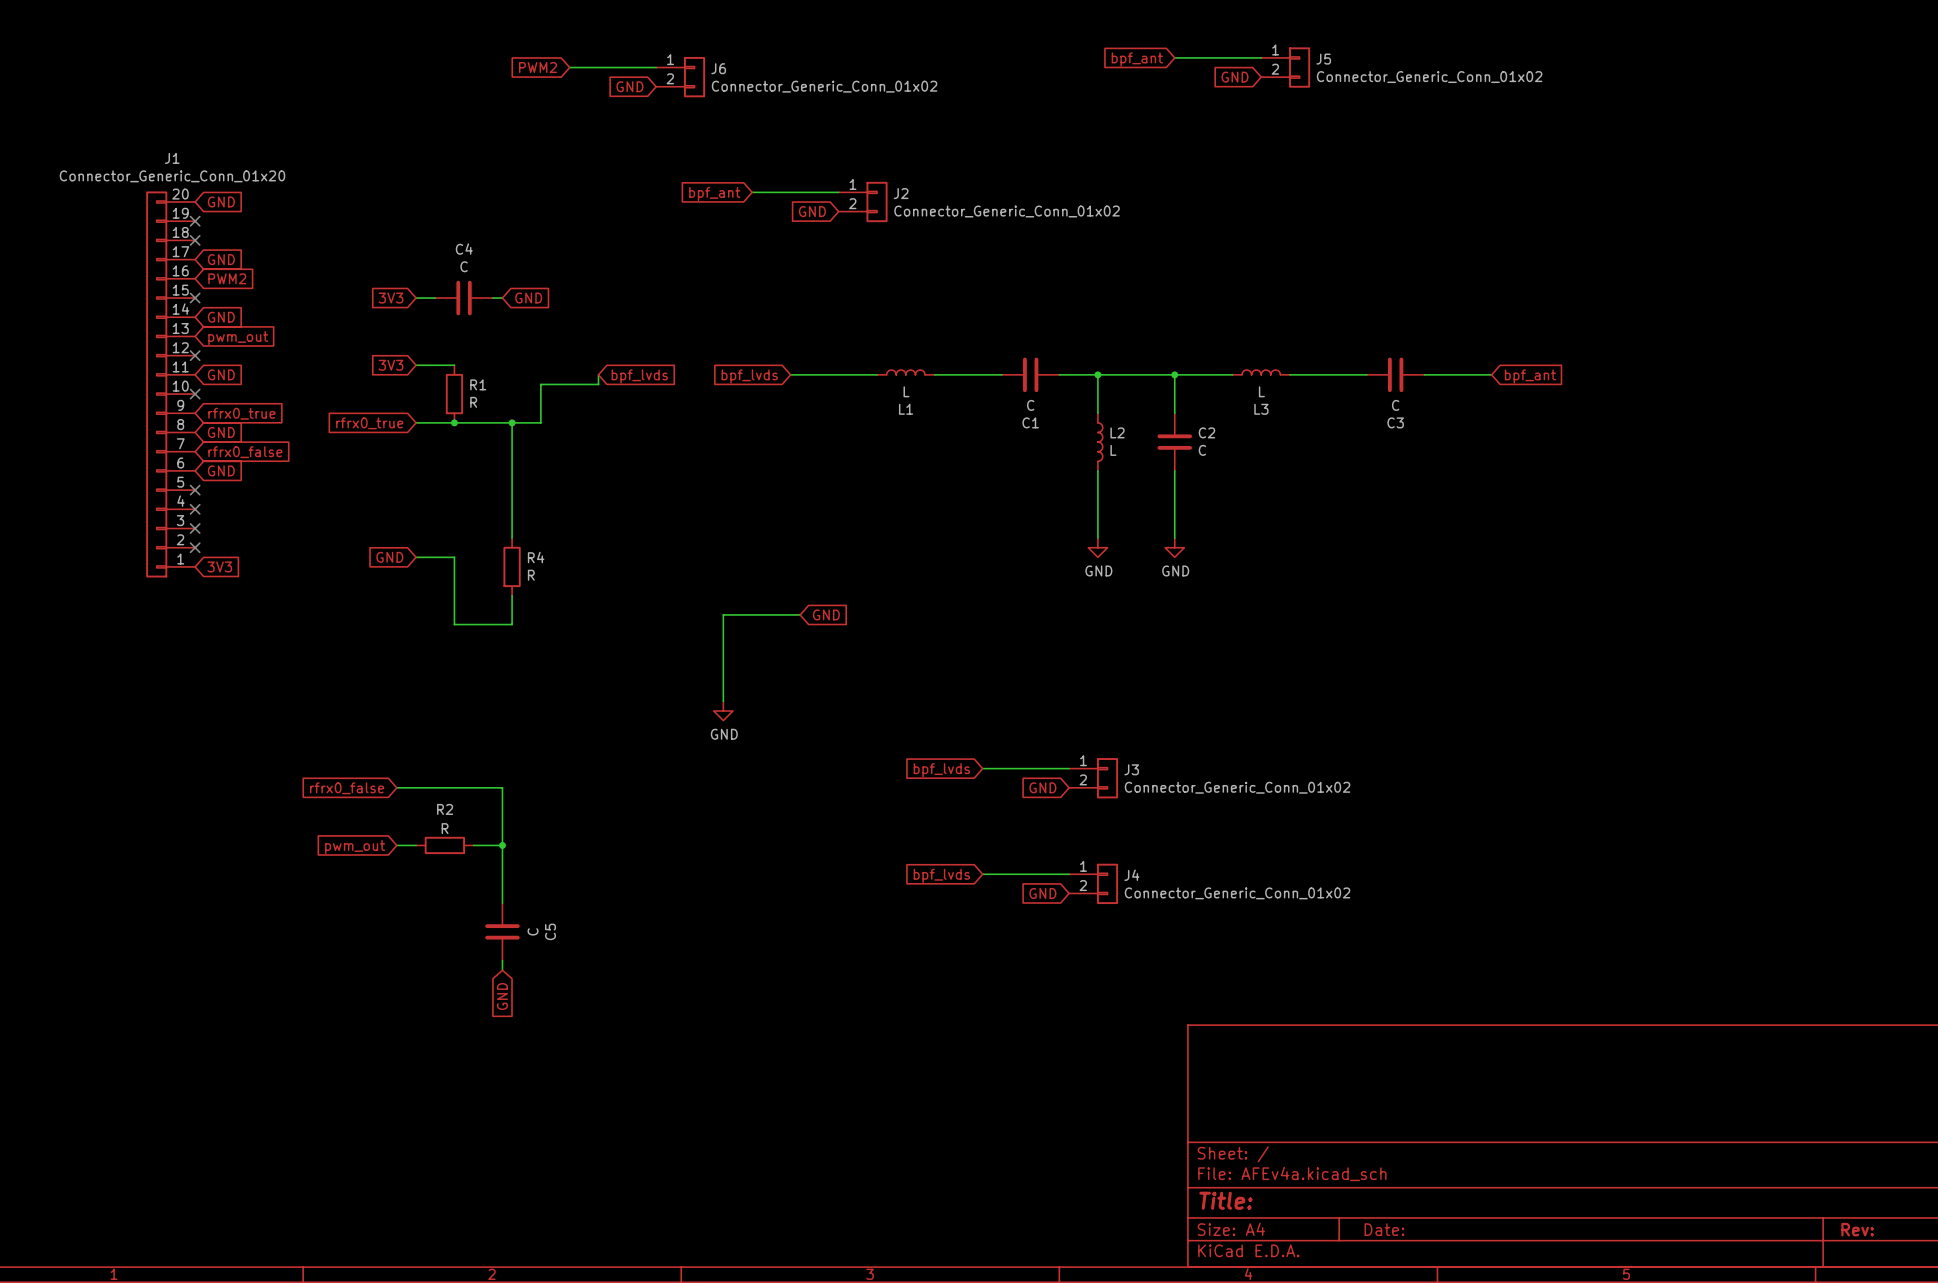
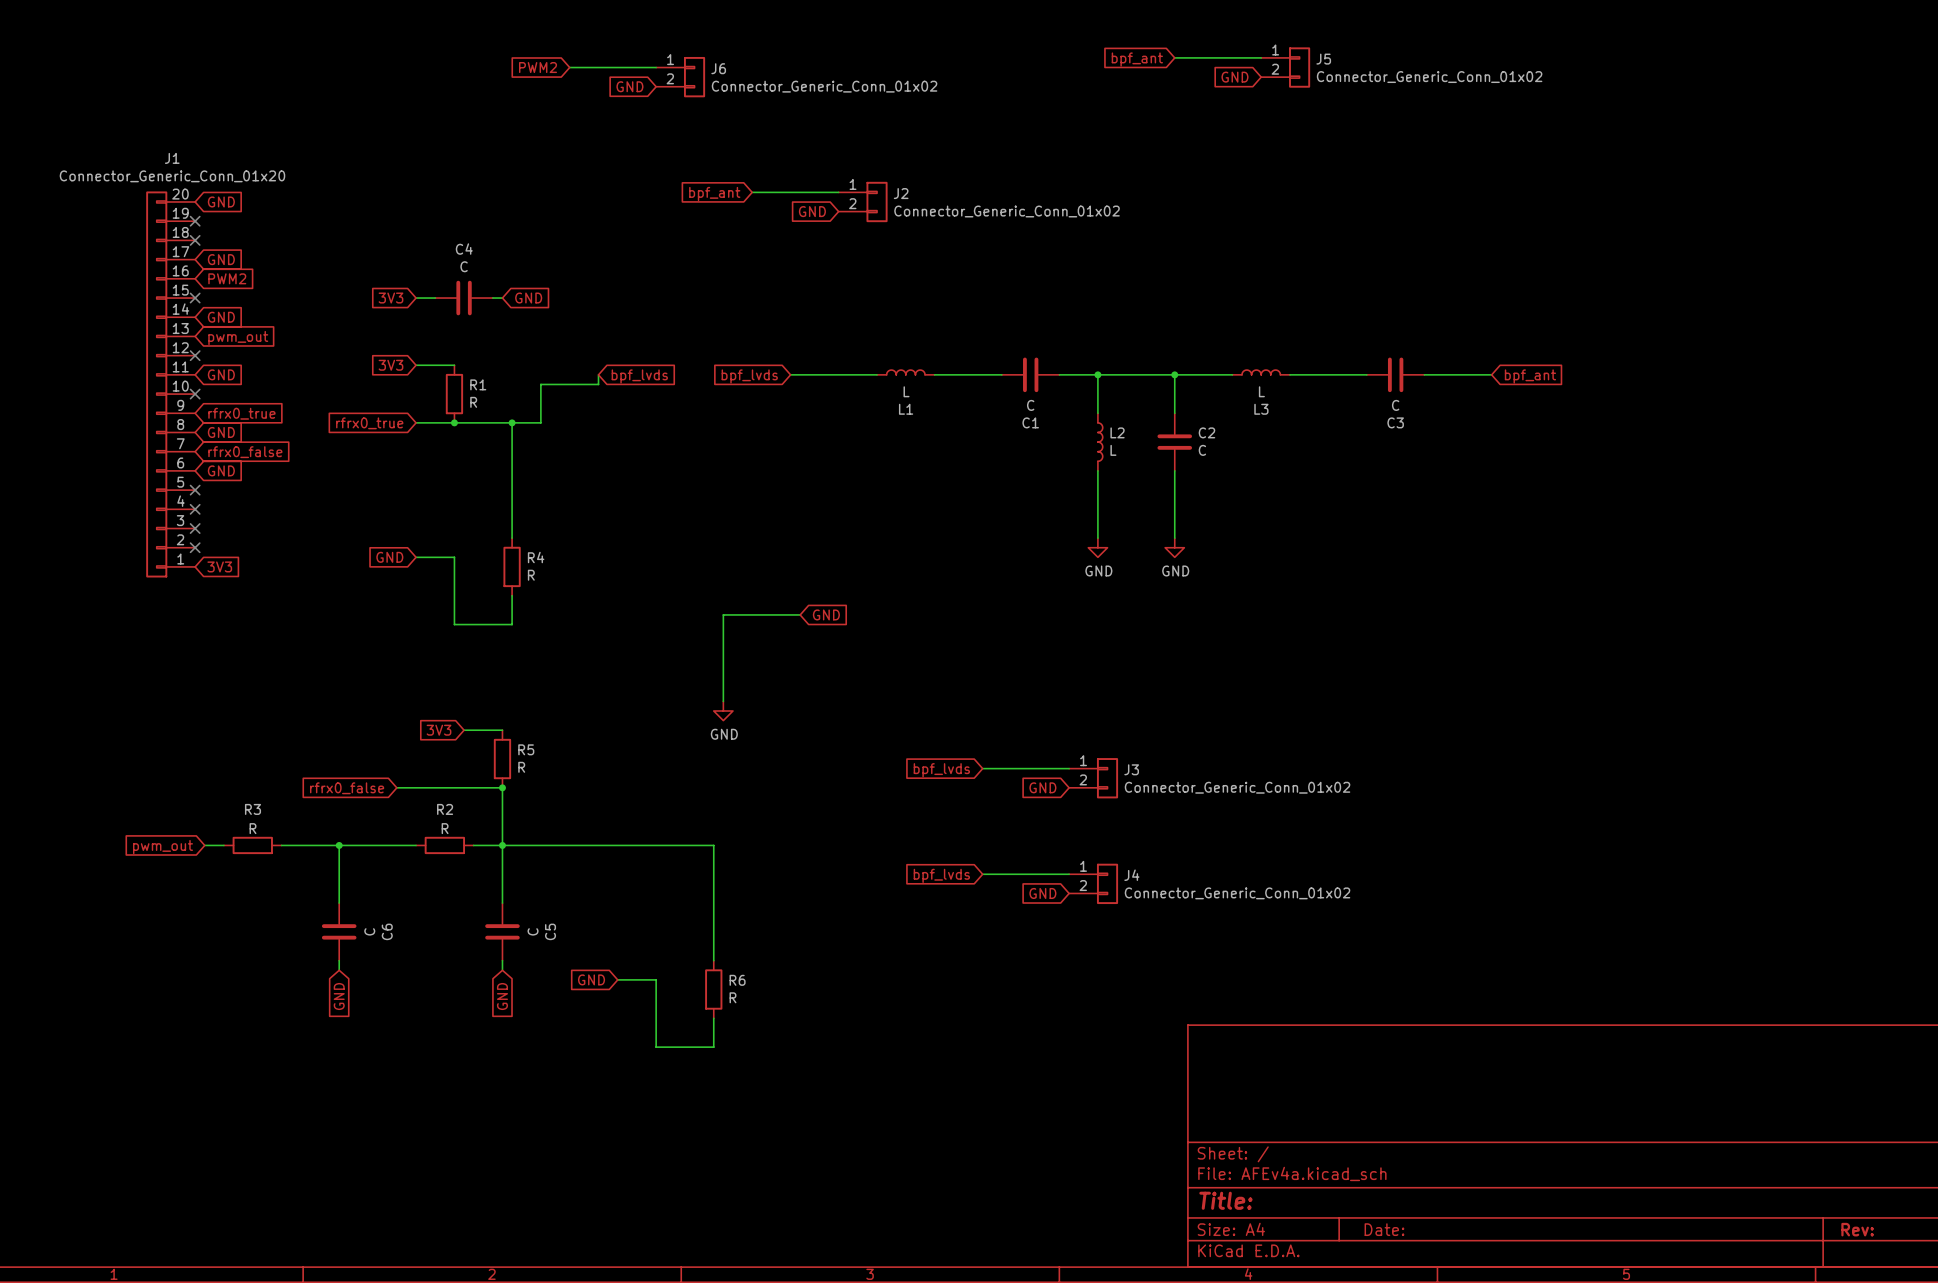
global label: none -> 3V3 (439, 730)
wire: none -> (464, 730) (502, 730)
R5: none -> R (502, 759)
junction: none -> (502, 787)
wire: none -> (204, 845) (223, 845)
R3: none -> R (252, 845)
wire: none -> (281, 845) (396, 845)
wire: none -> (339, 845) (339, 903)
junction: none -> (339, 845)
wire: none -> (502, 845) (713, 845) (713, 960)
global label: none -> pwm_out (163, 847)
global label: pwm_out (355, 847) -> none
C6: none -> C (339, 931)
wire: none -> (339, 960) (339, 970)
global label: none -> GND (591, 979)
wire: none -> (617, 979) (656, 979) (656, 1047) (713, 1047) (713, 1018)
R6: none -> R (713, 989)
global label: none -> GND (339, 996)

